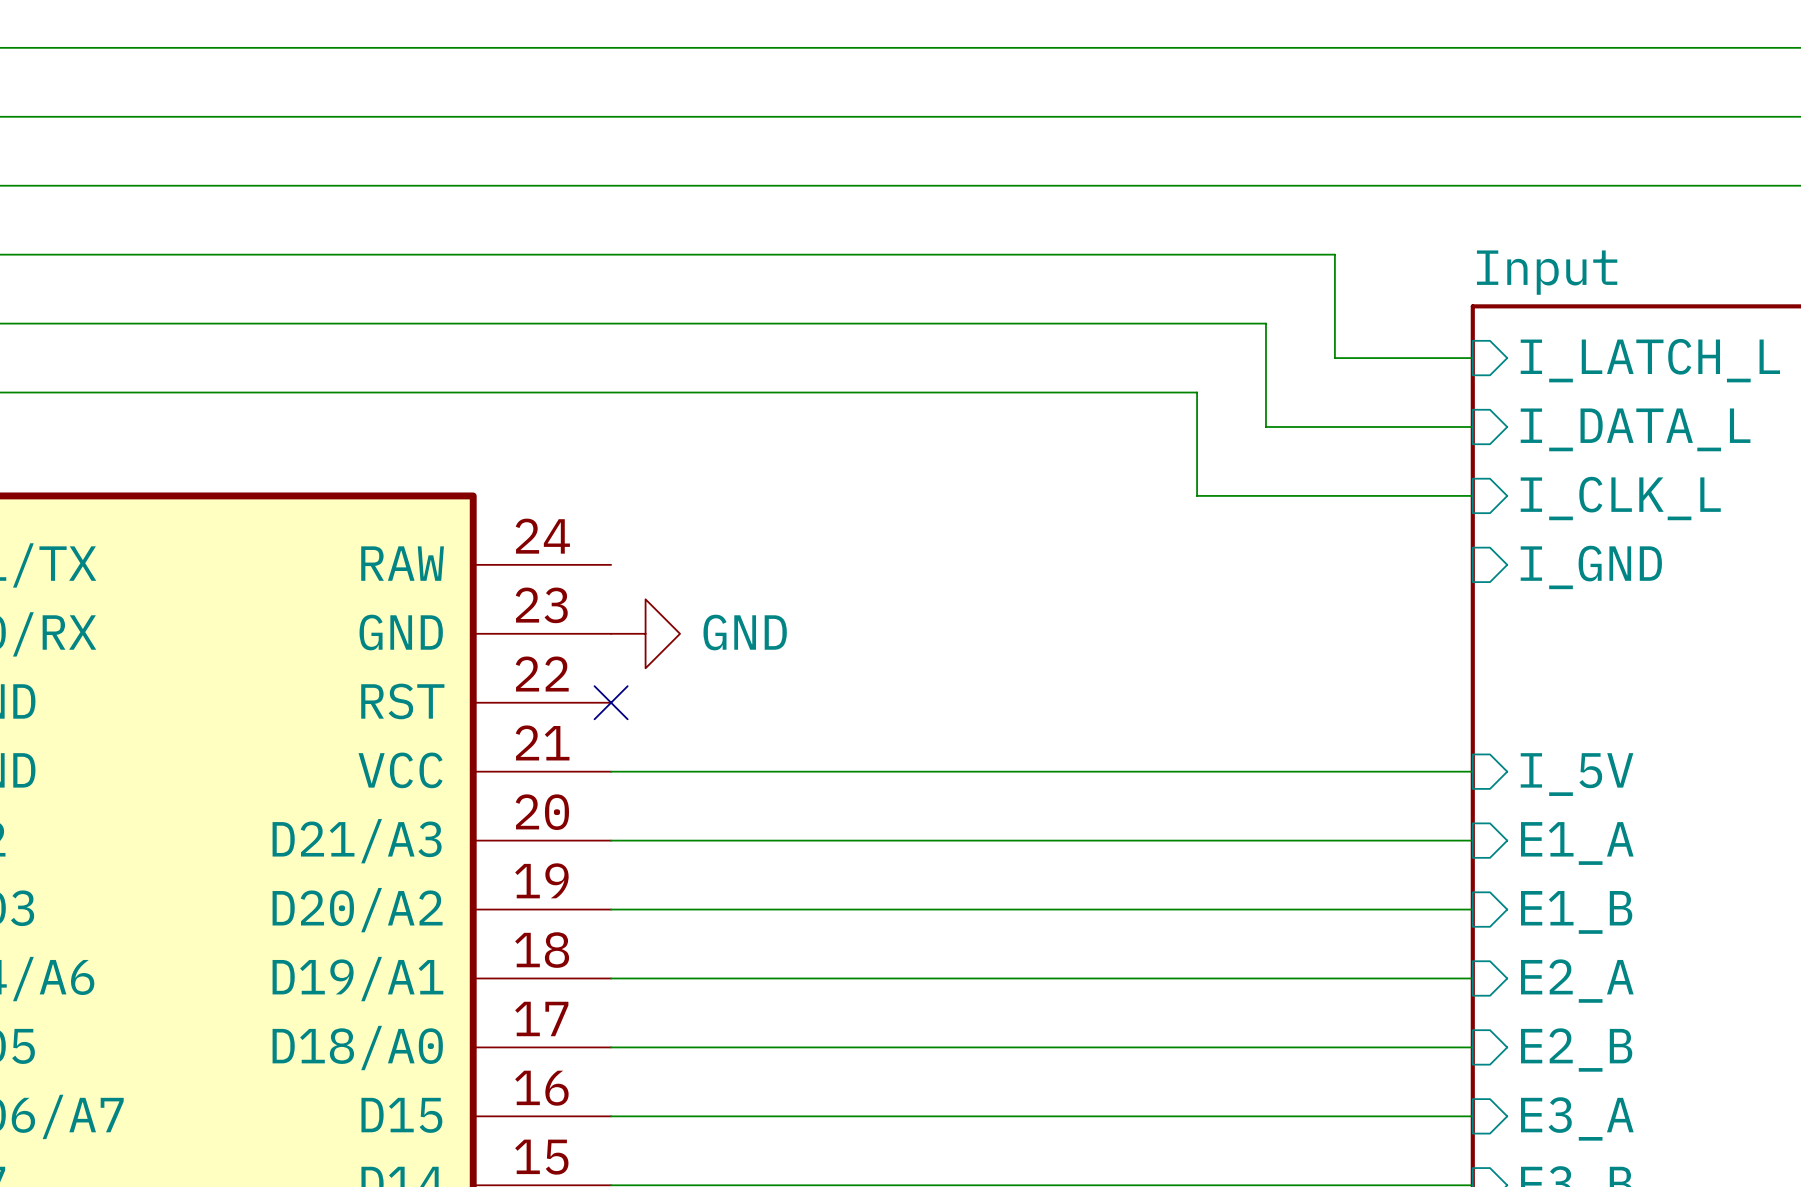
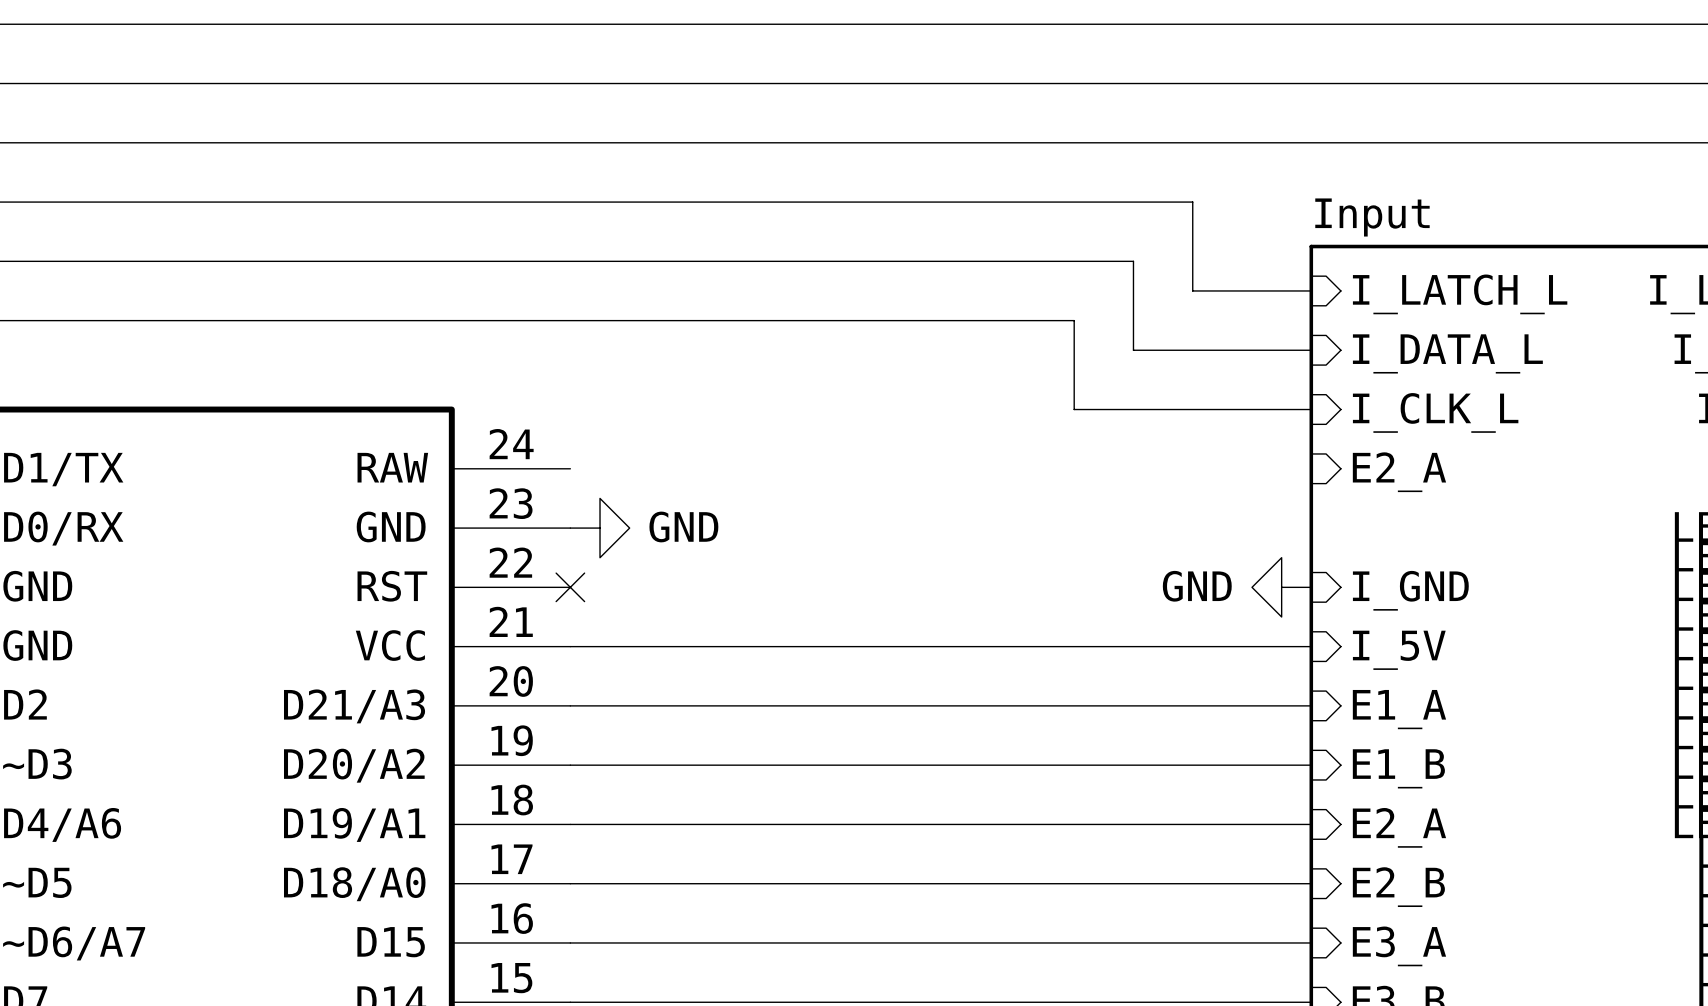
sheet pin: I_GND (1591, 567) -> E2_A (1399, 472)
power symbol: none -> GND (1281, 587)
sheet pin: none -> I_GND (1410, 590)

